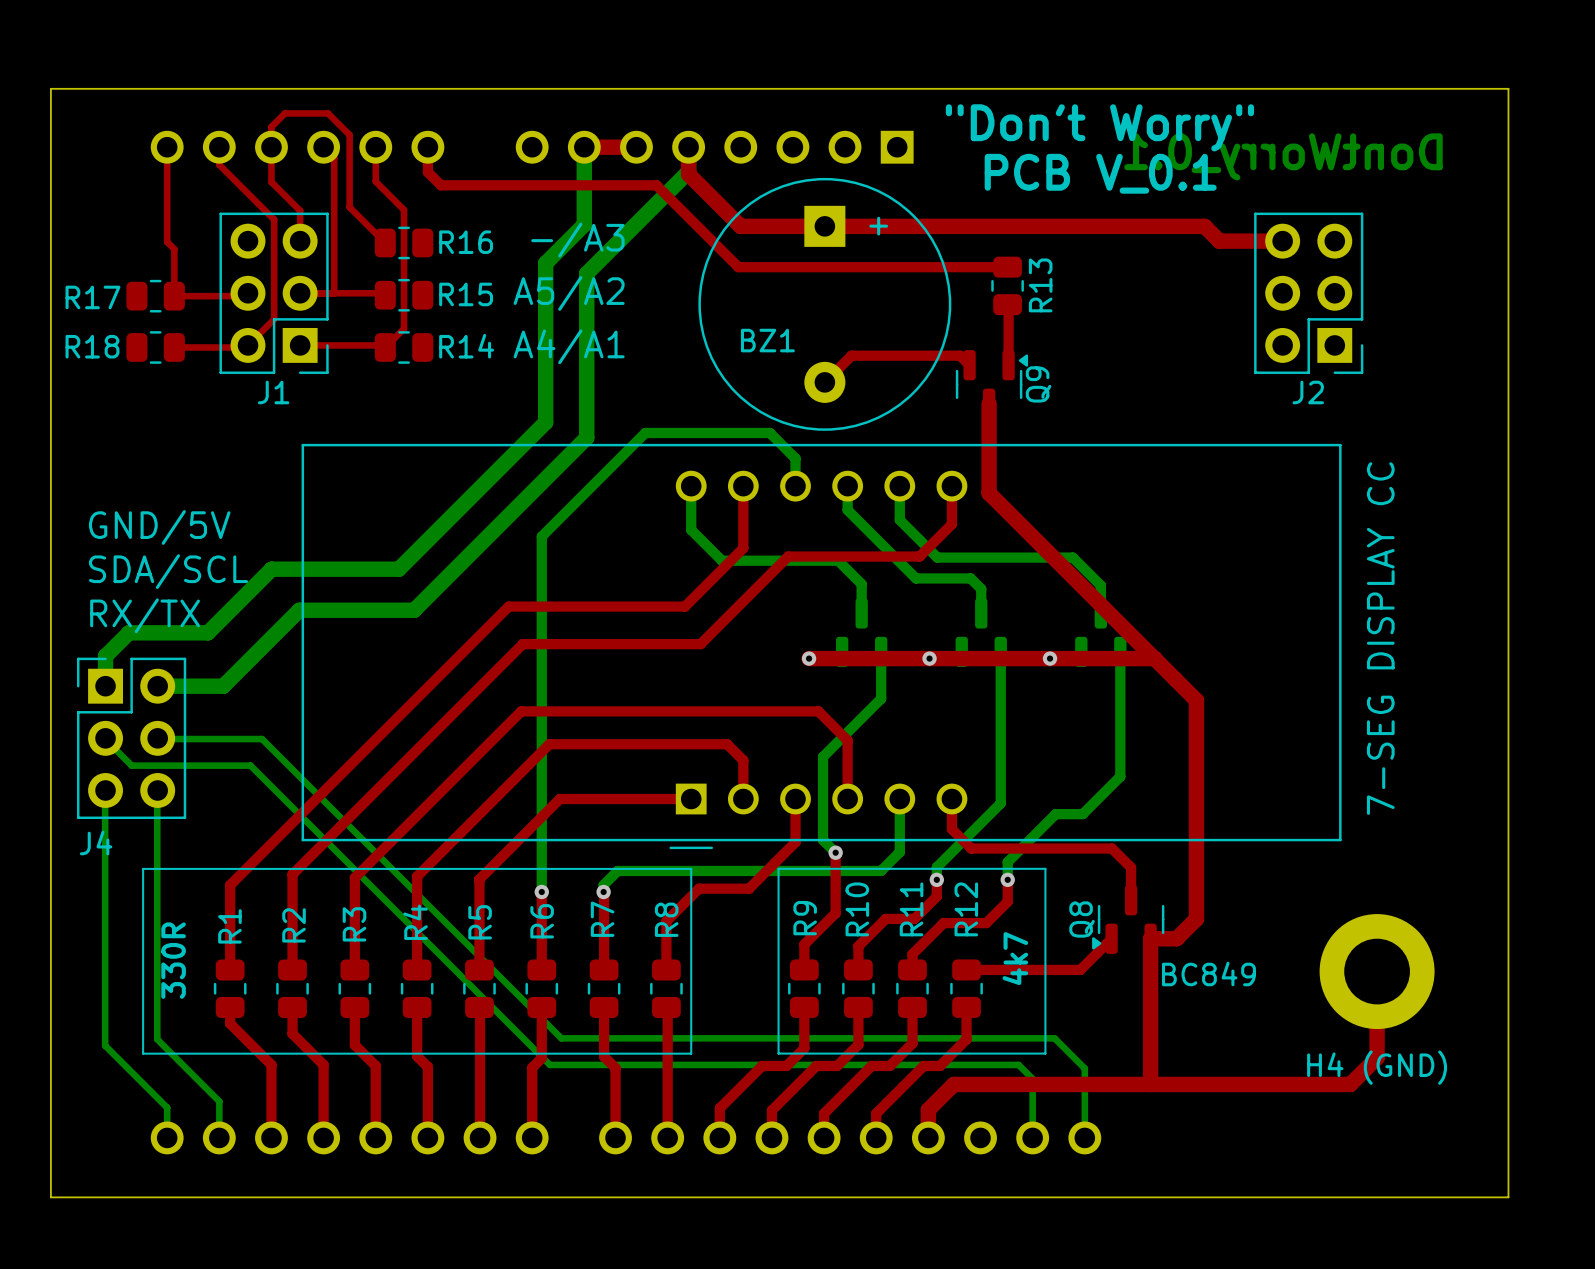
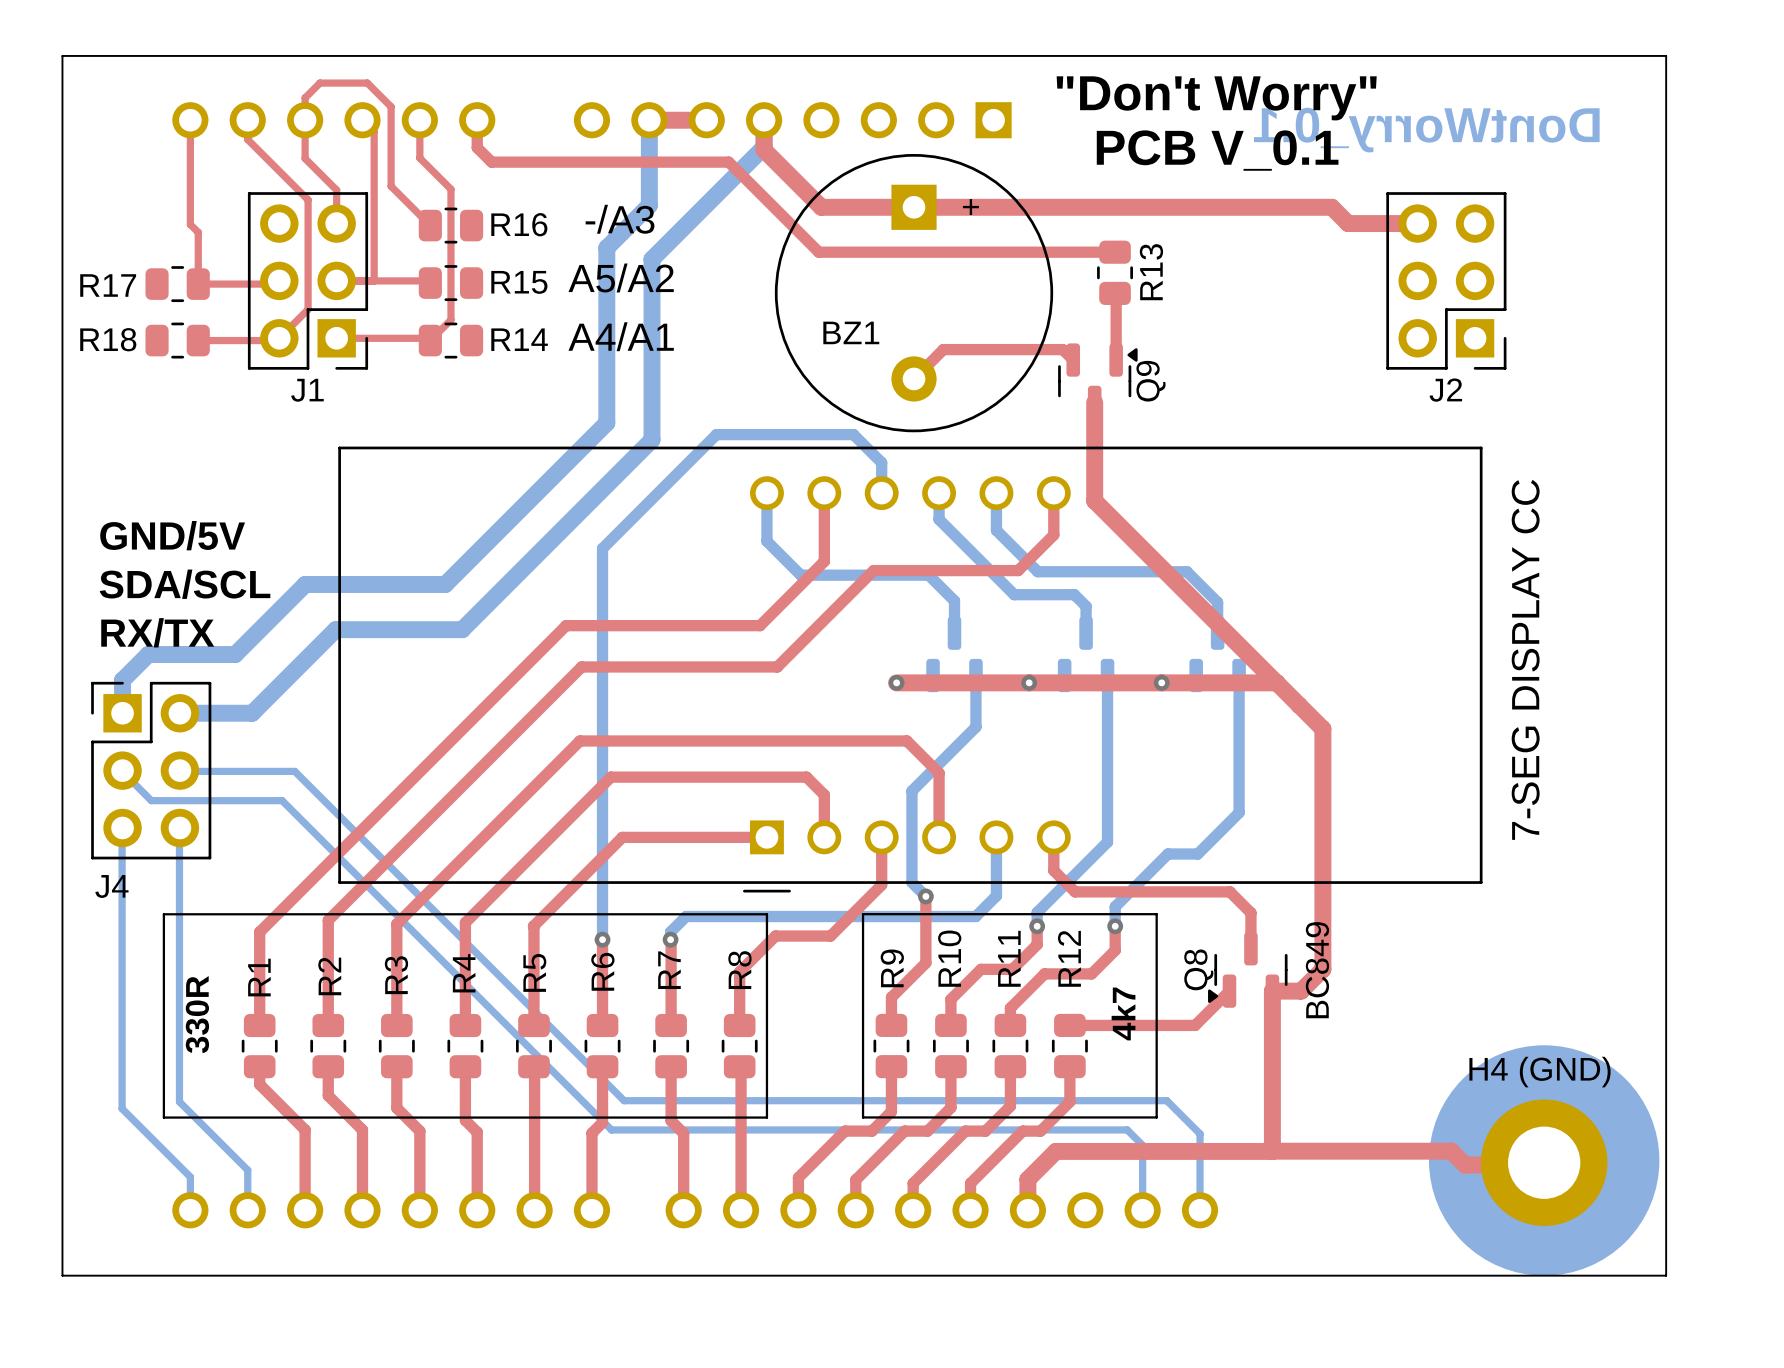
top track: (1377, 971) (1377, 1057) (1350, 1084) (1150, 1084) -> (1544, 1162) (1541, 1164) (1465, 1164) (1451, 1151) (1272, 1151)
H4 (GND) position: (1377, 971) -> (1544, 1162)
Q8 value rotation: 0° (1208, 974) -> 90° counterclockwise (1317, 970)
drawing: none -> [1428, 1045, 1660, 1276]
H4 (GND) name position: H4 (GND) (1377, 1067) -> H4 (GND) (1539, 1072)

